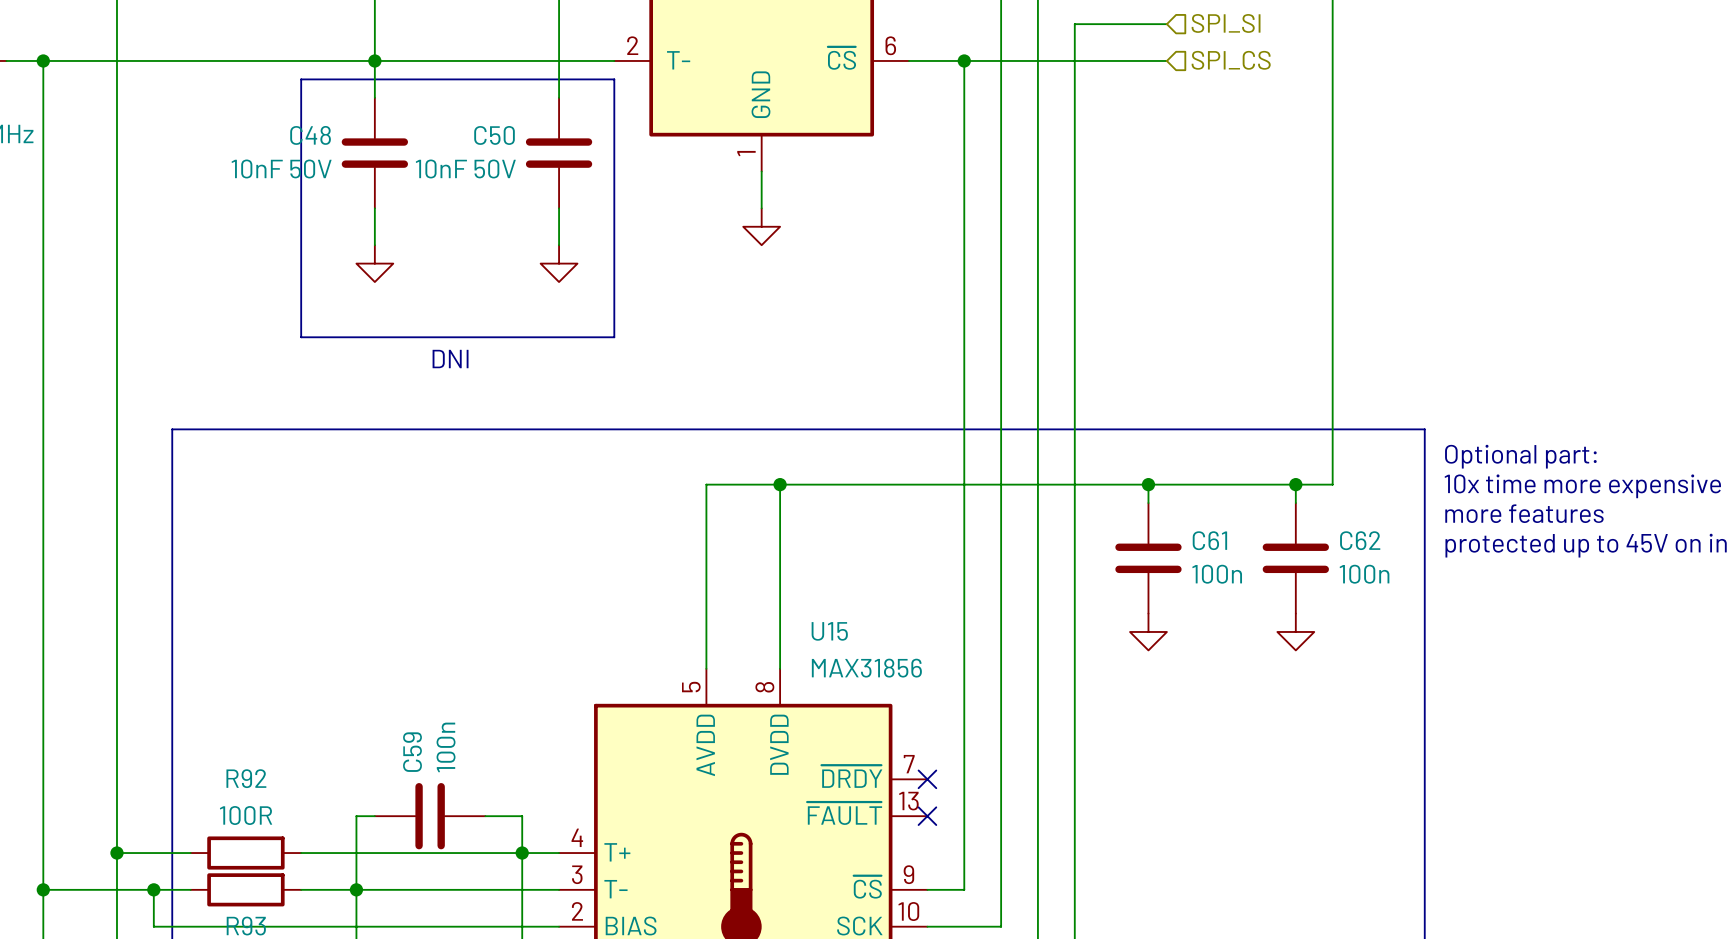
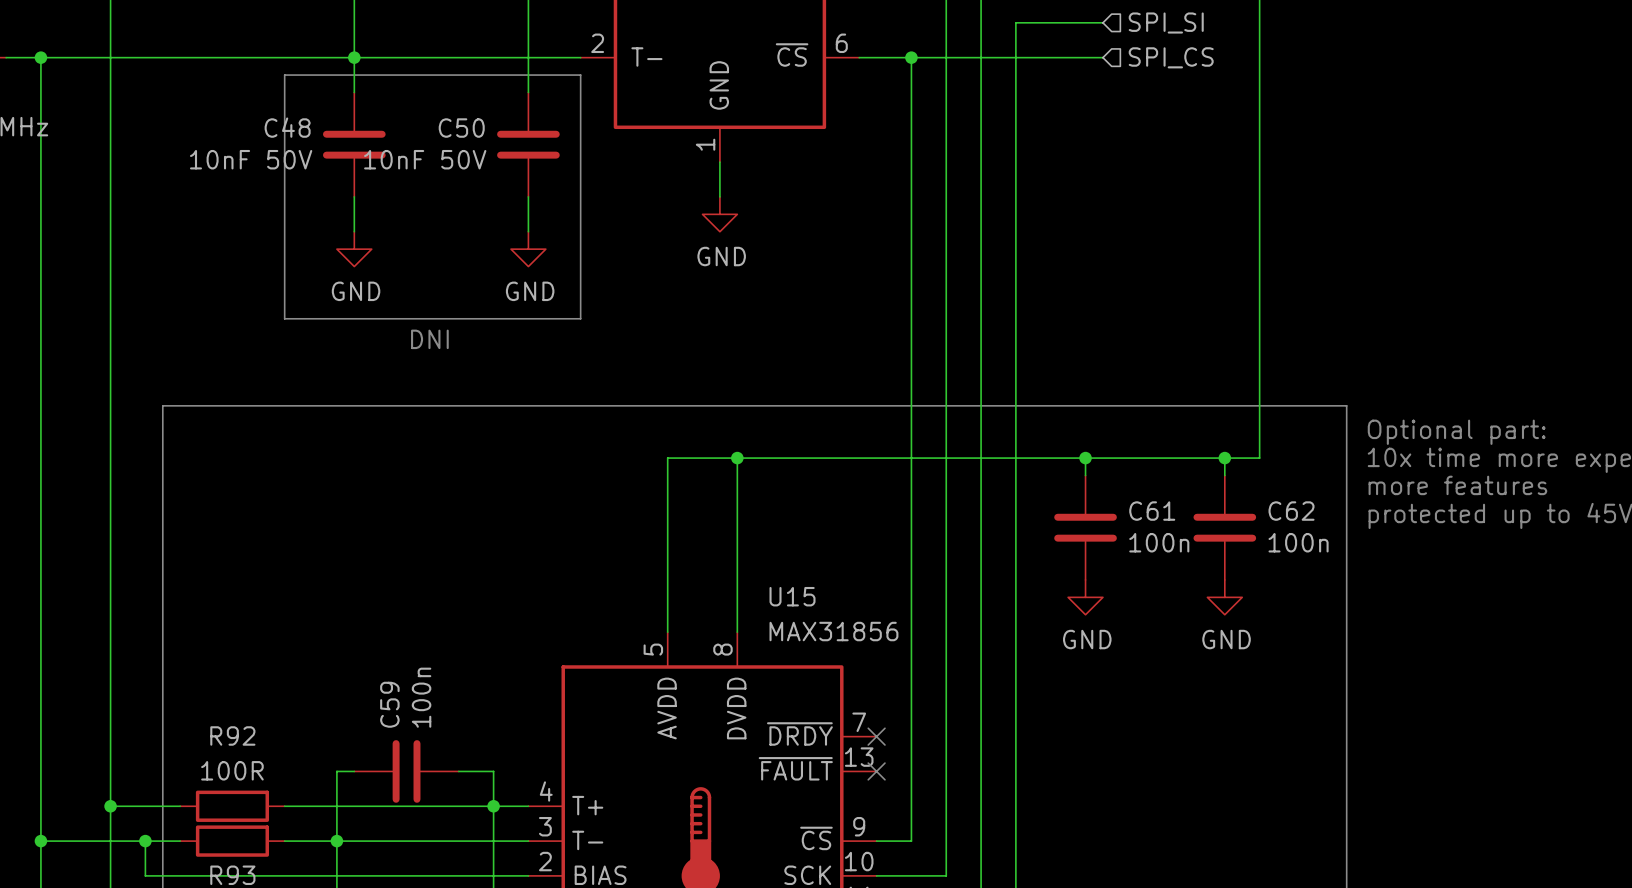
power symbol text: none -> GND (721, 256)
power symbol text: none -> GND (356, 291)
power symbol text: none -> GND (530, 291)
power symbol text: none -> GND (1087, 639)
power symbol text: none -> GND (1226, 639)

